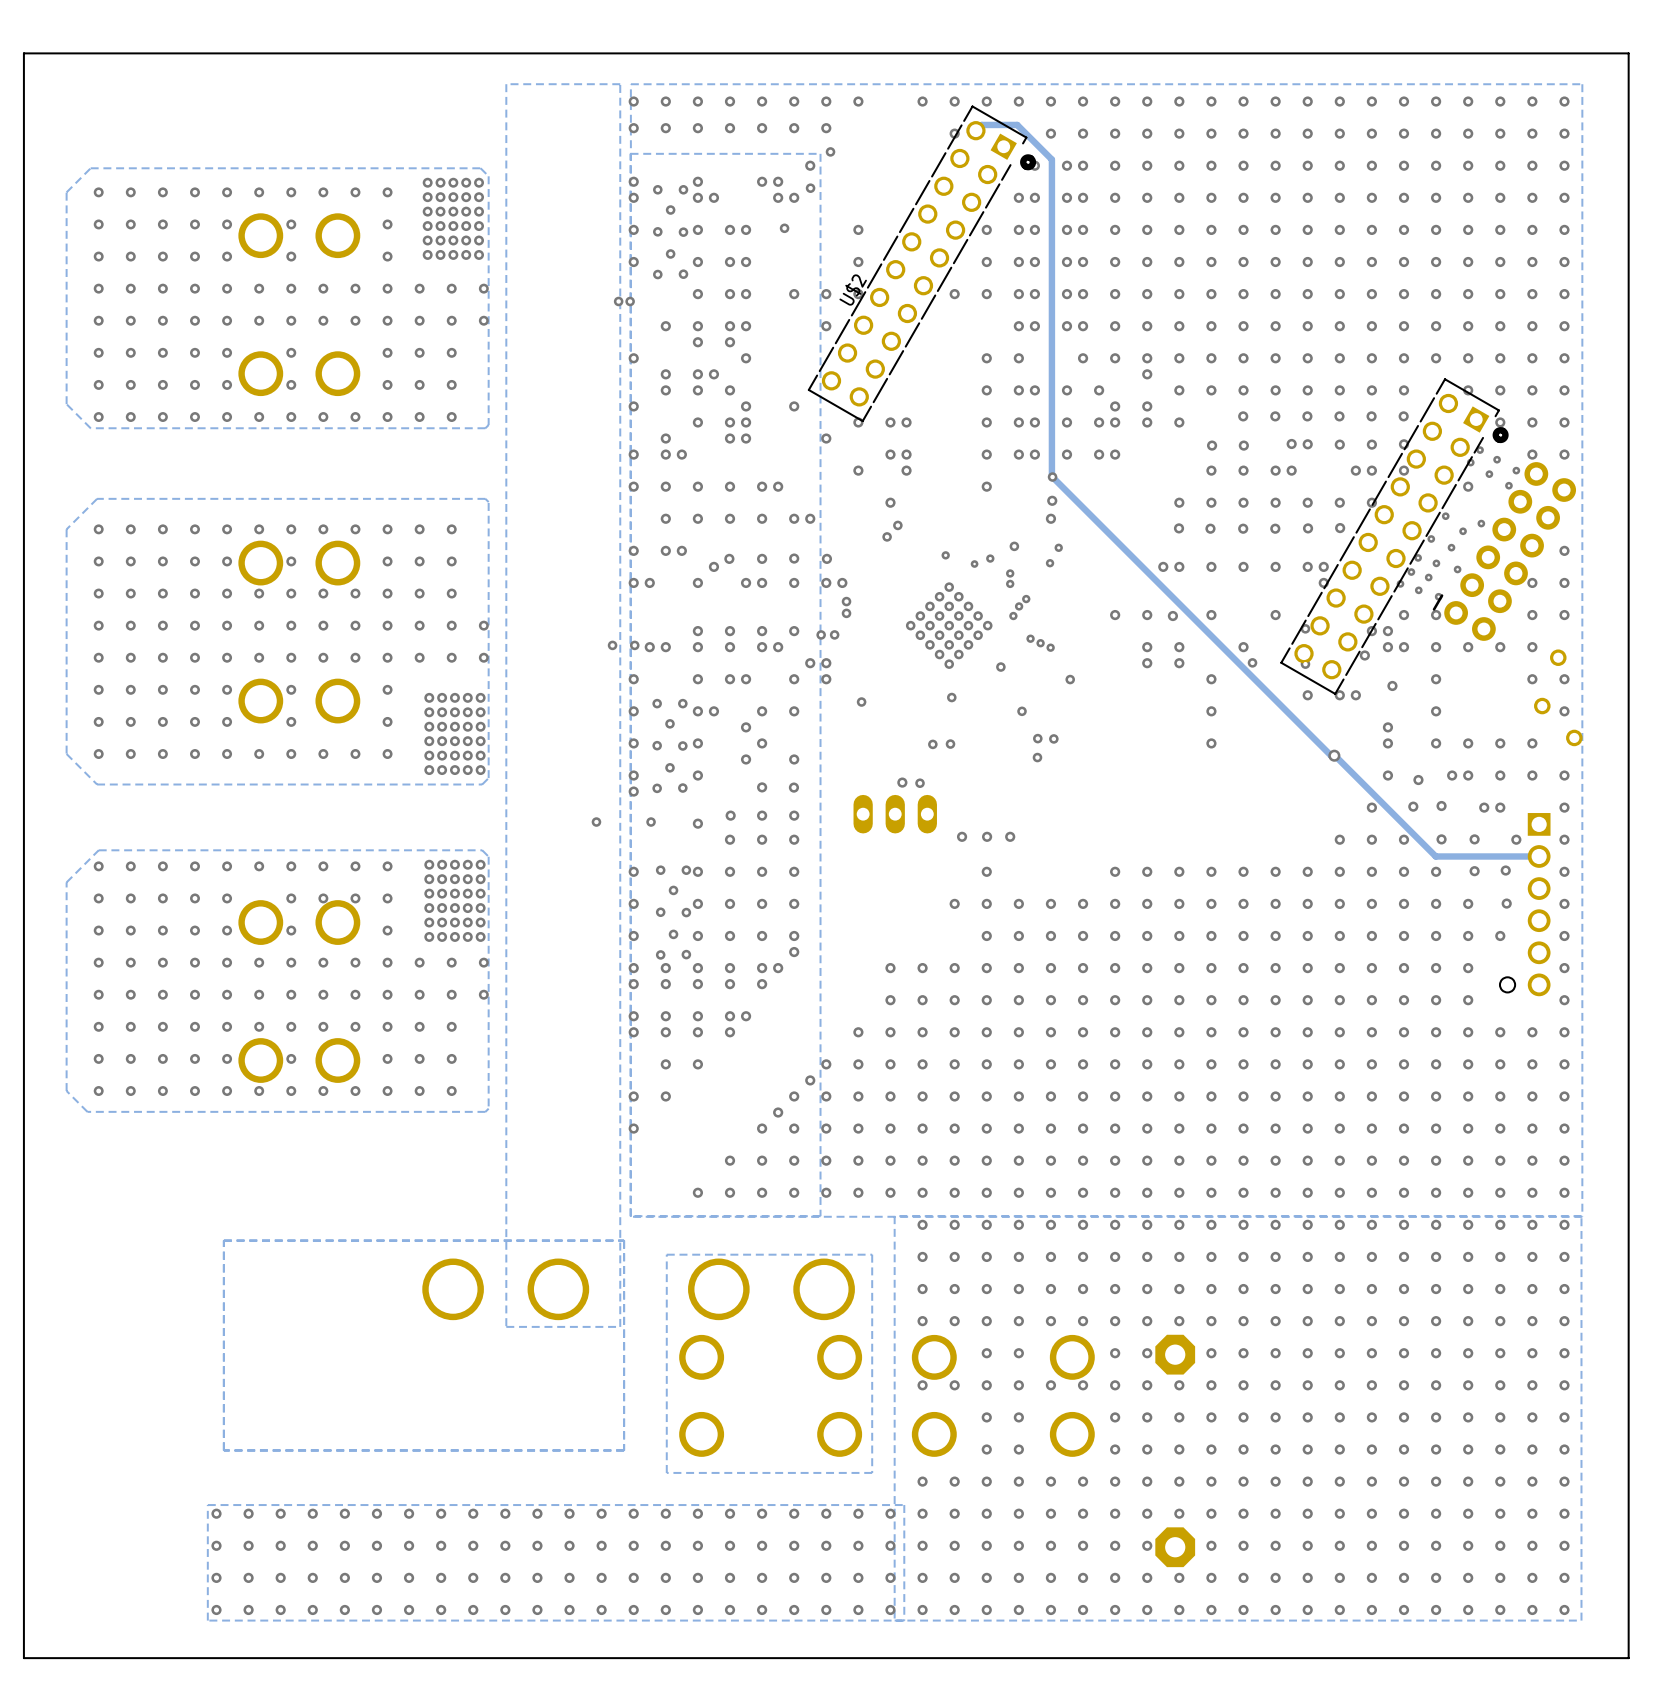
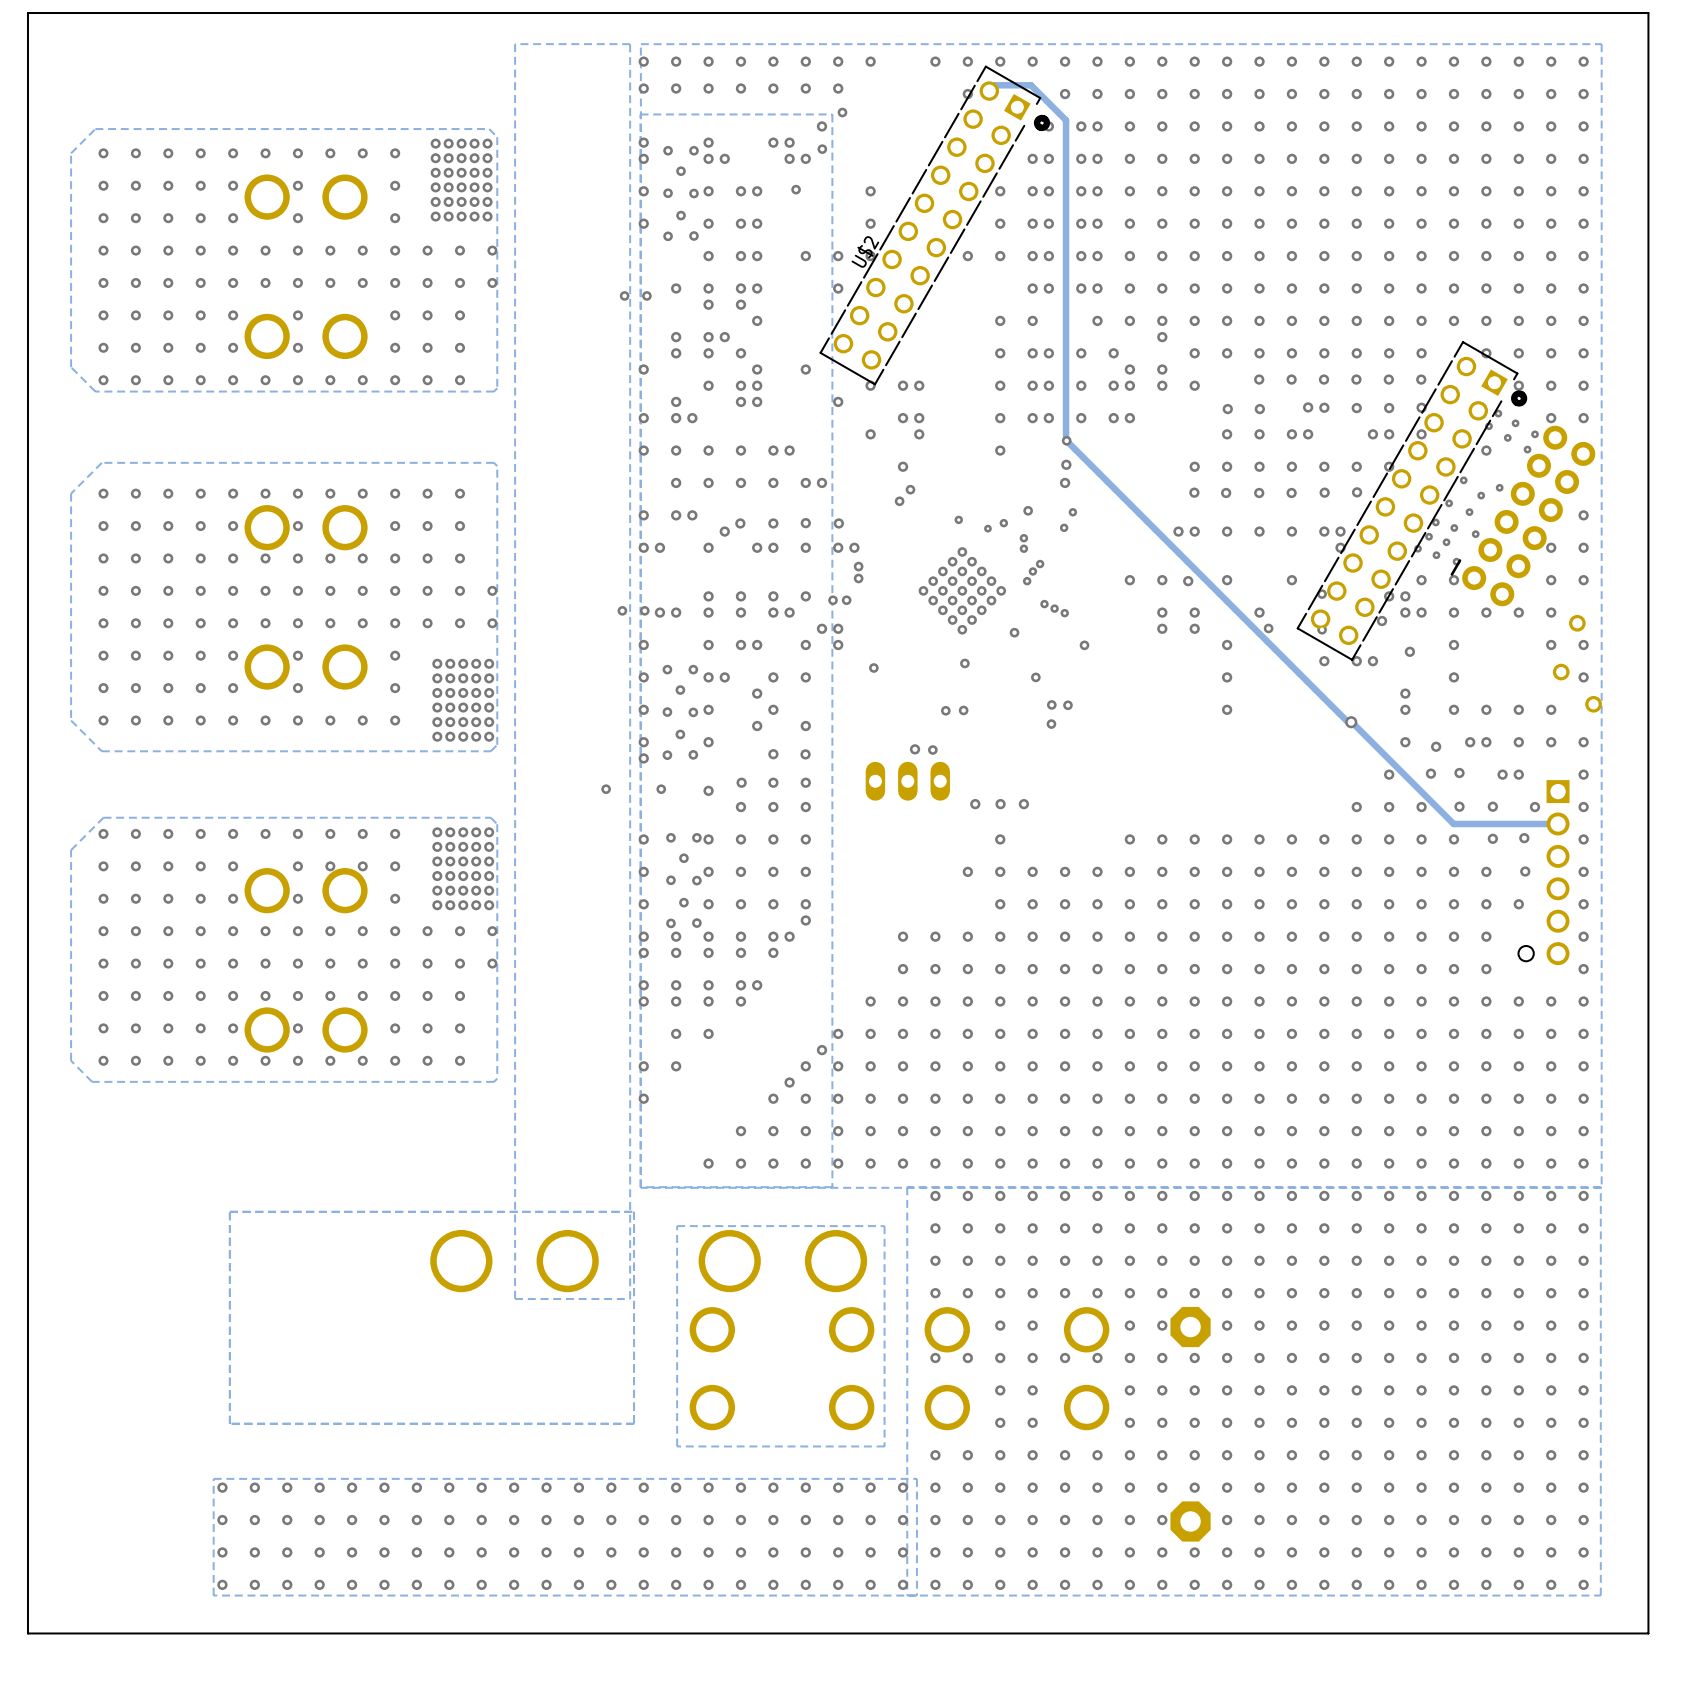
via: (618, 301) -> none
via: (630, 301) -> none
via: none -> (624, 295)
via: none -> (646, 295)
via: (633, 358) -> none

